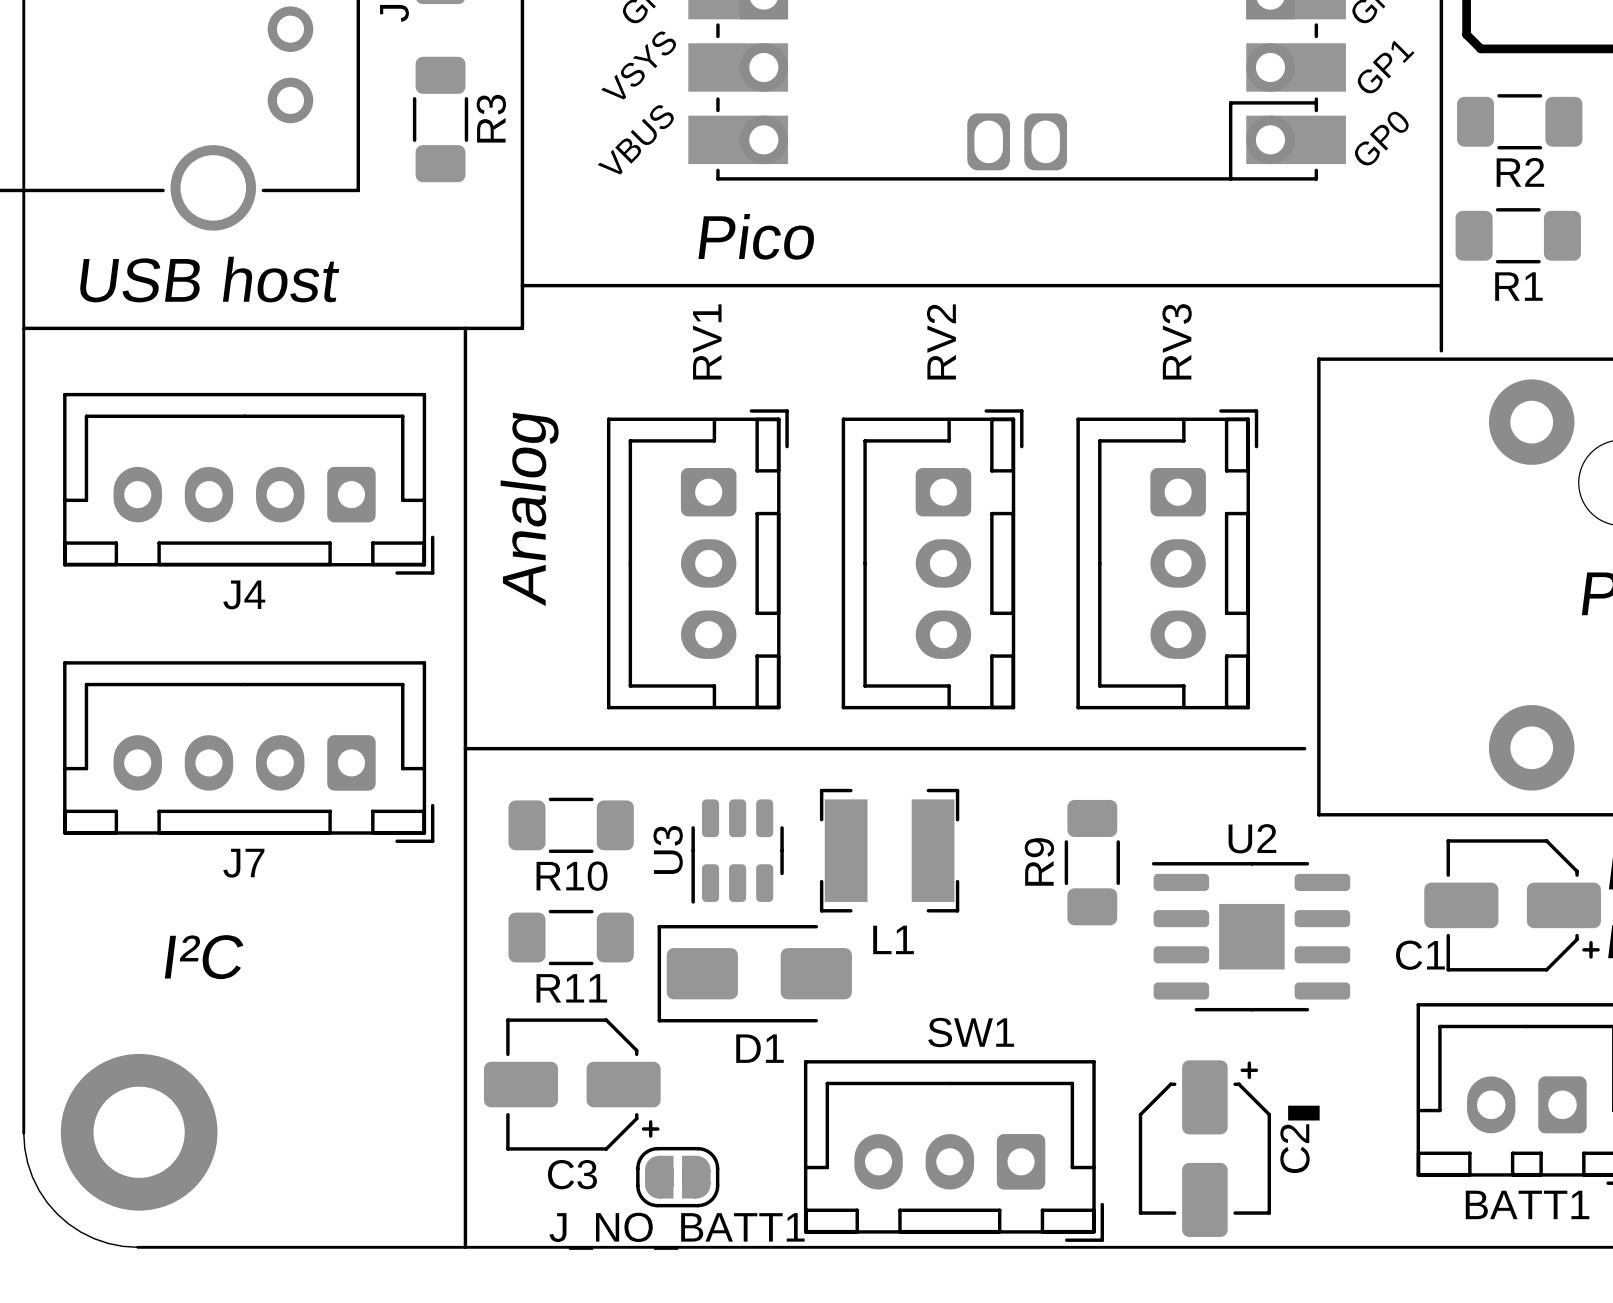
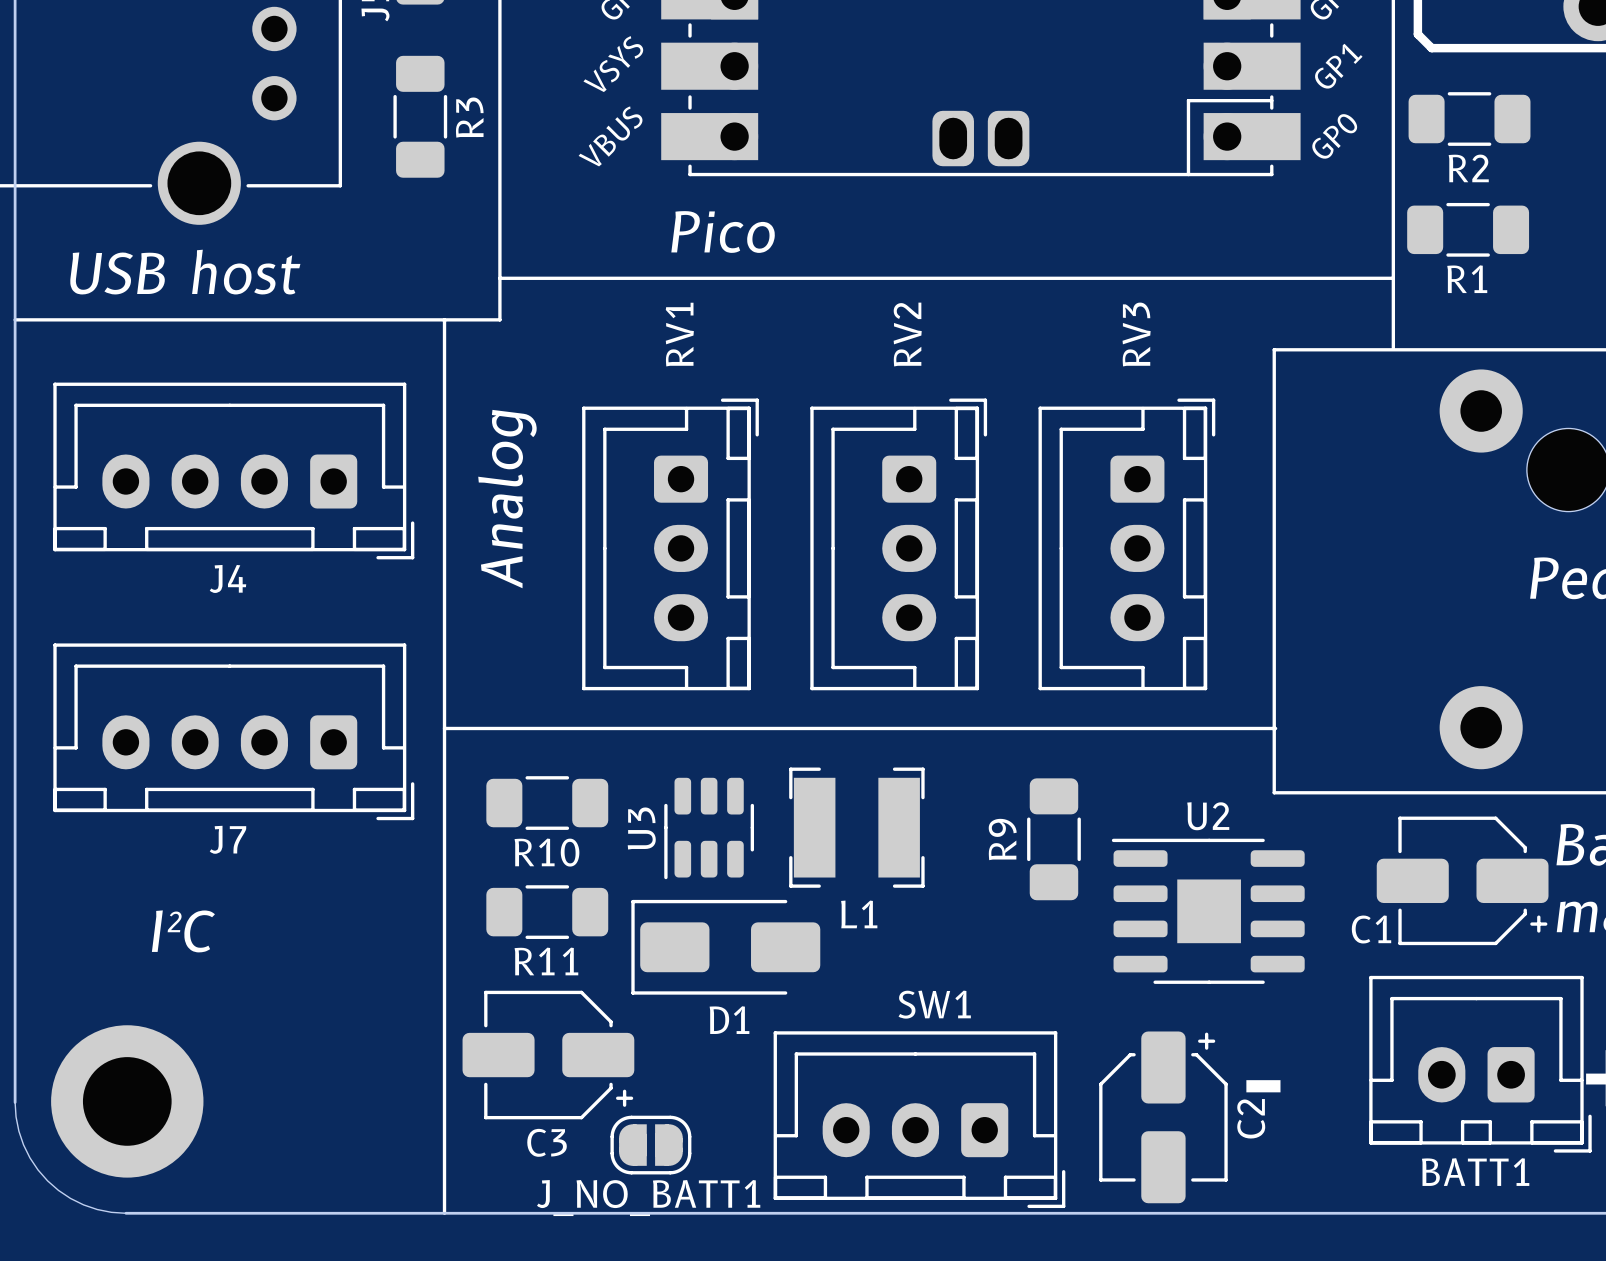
line: none -> (1393, 341) (1393, 347)
line: none -> (1260, 728) (1275, 728)

